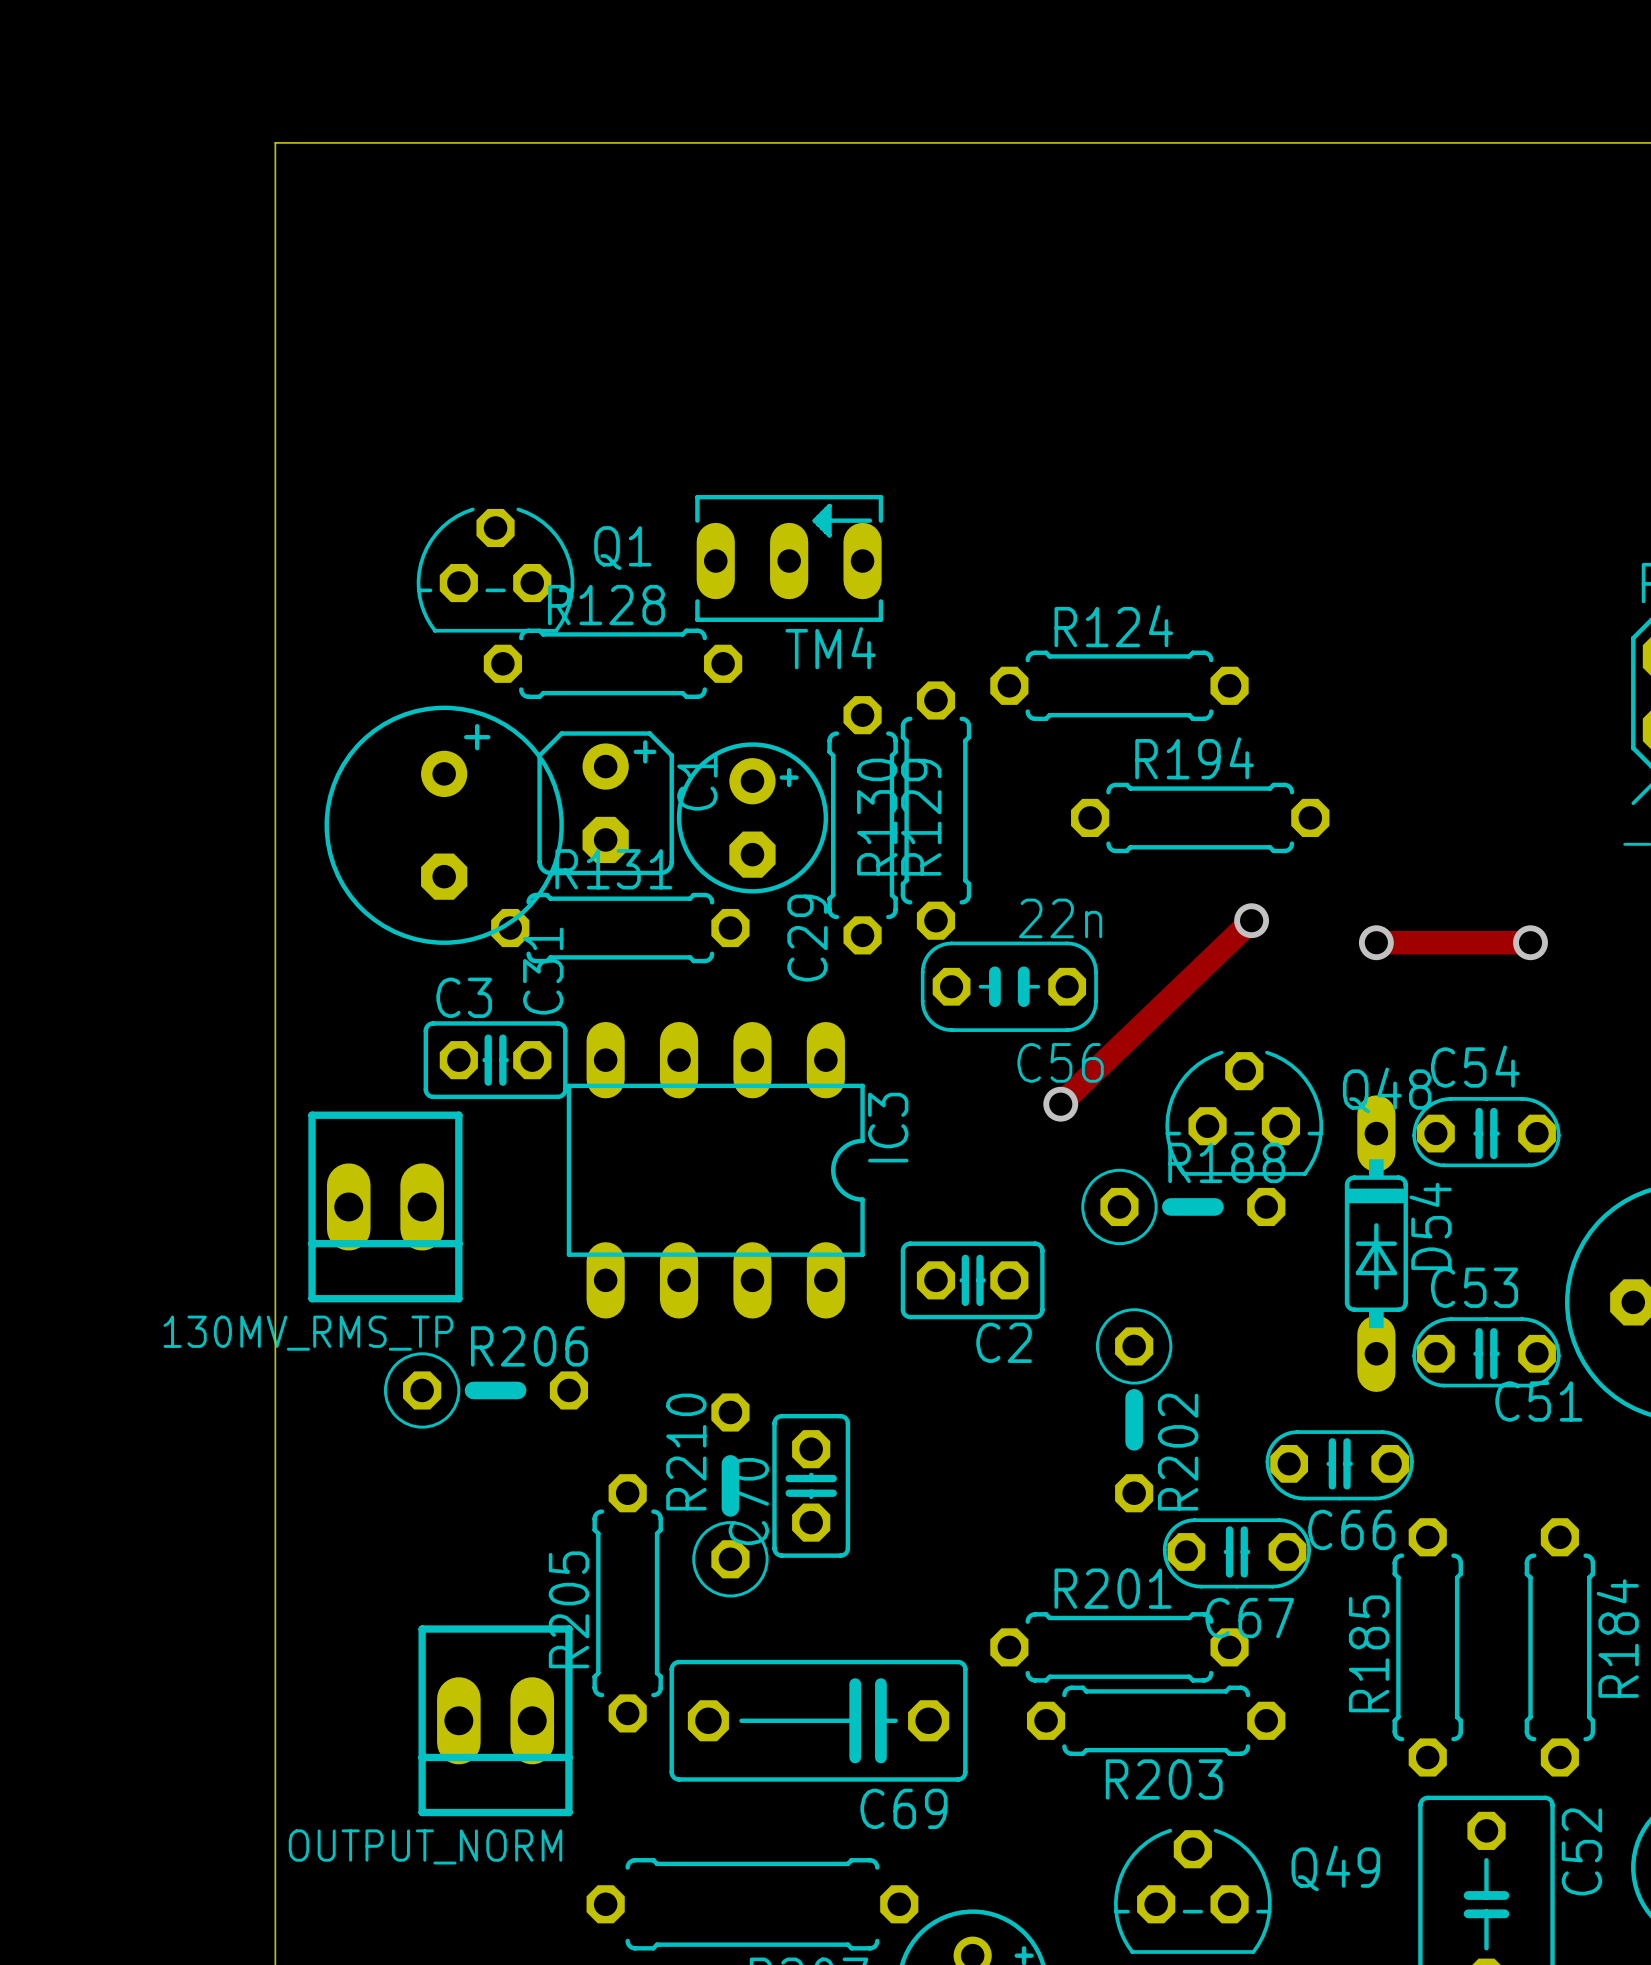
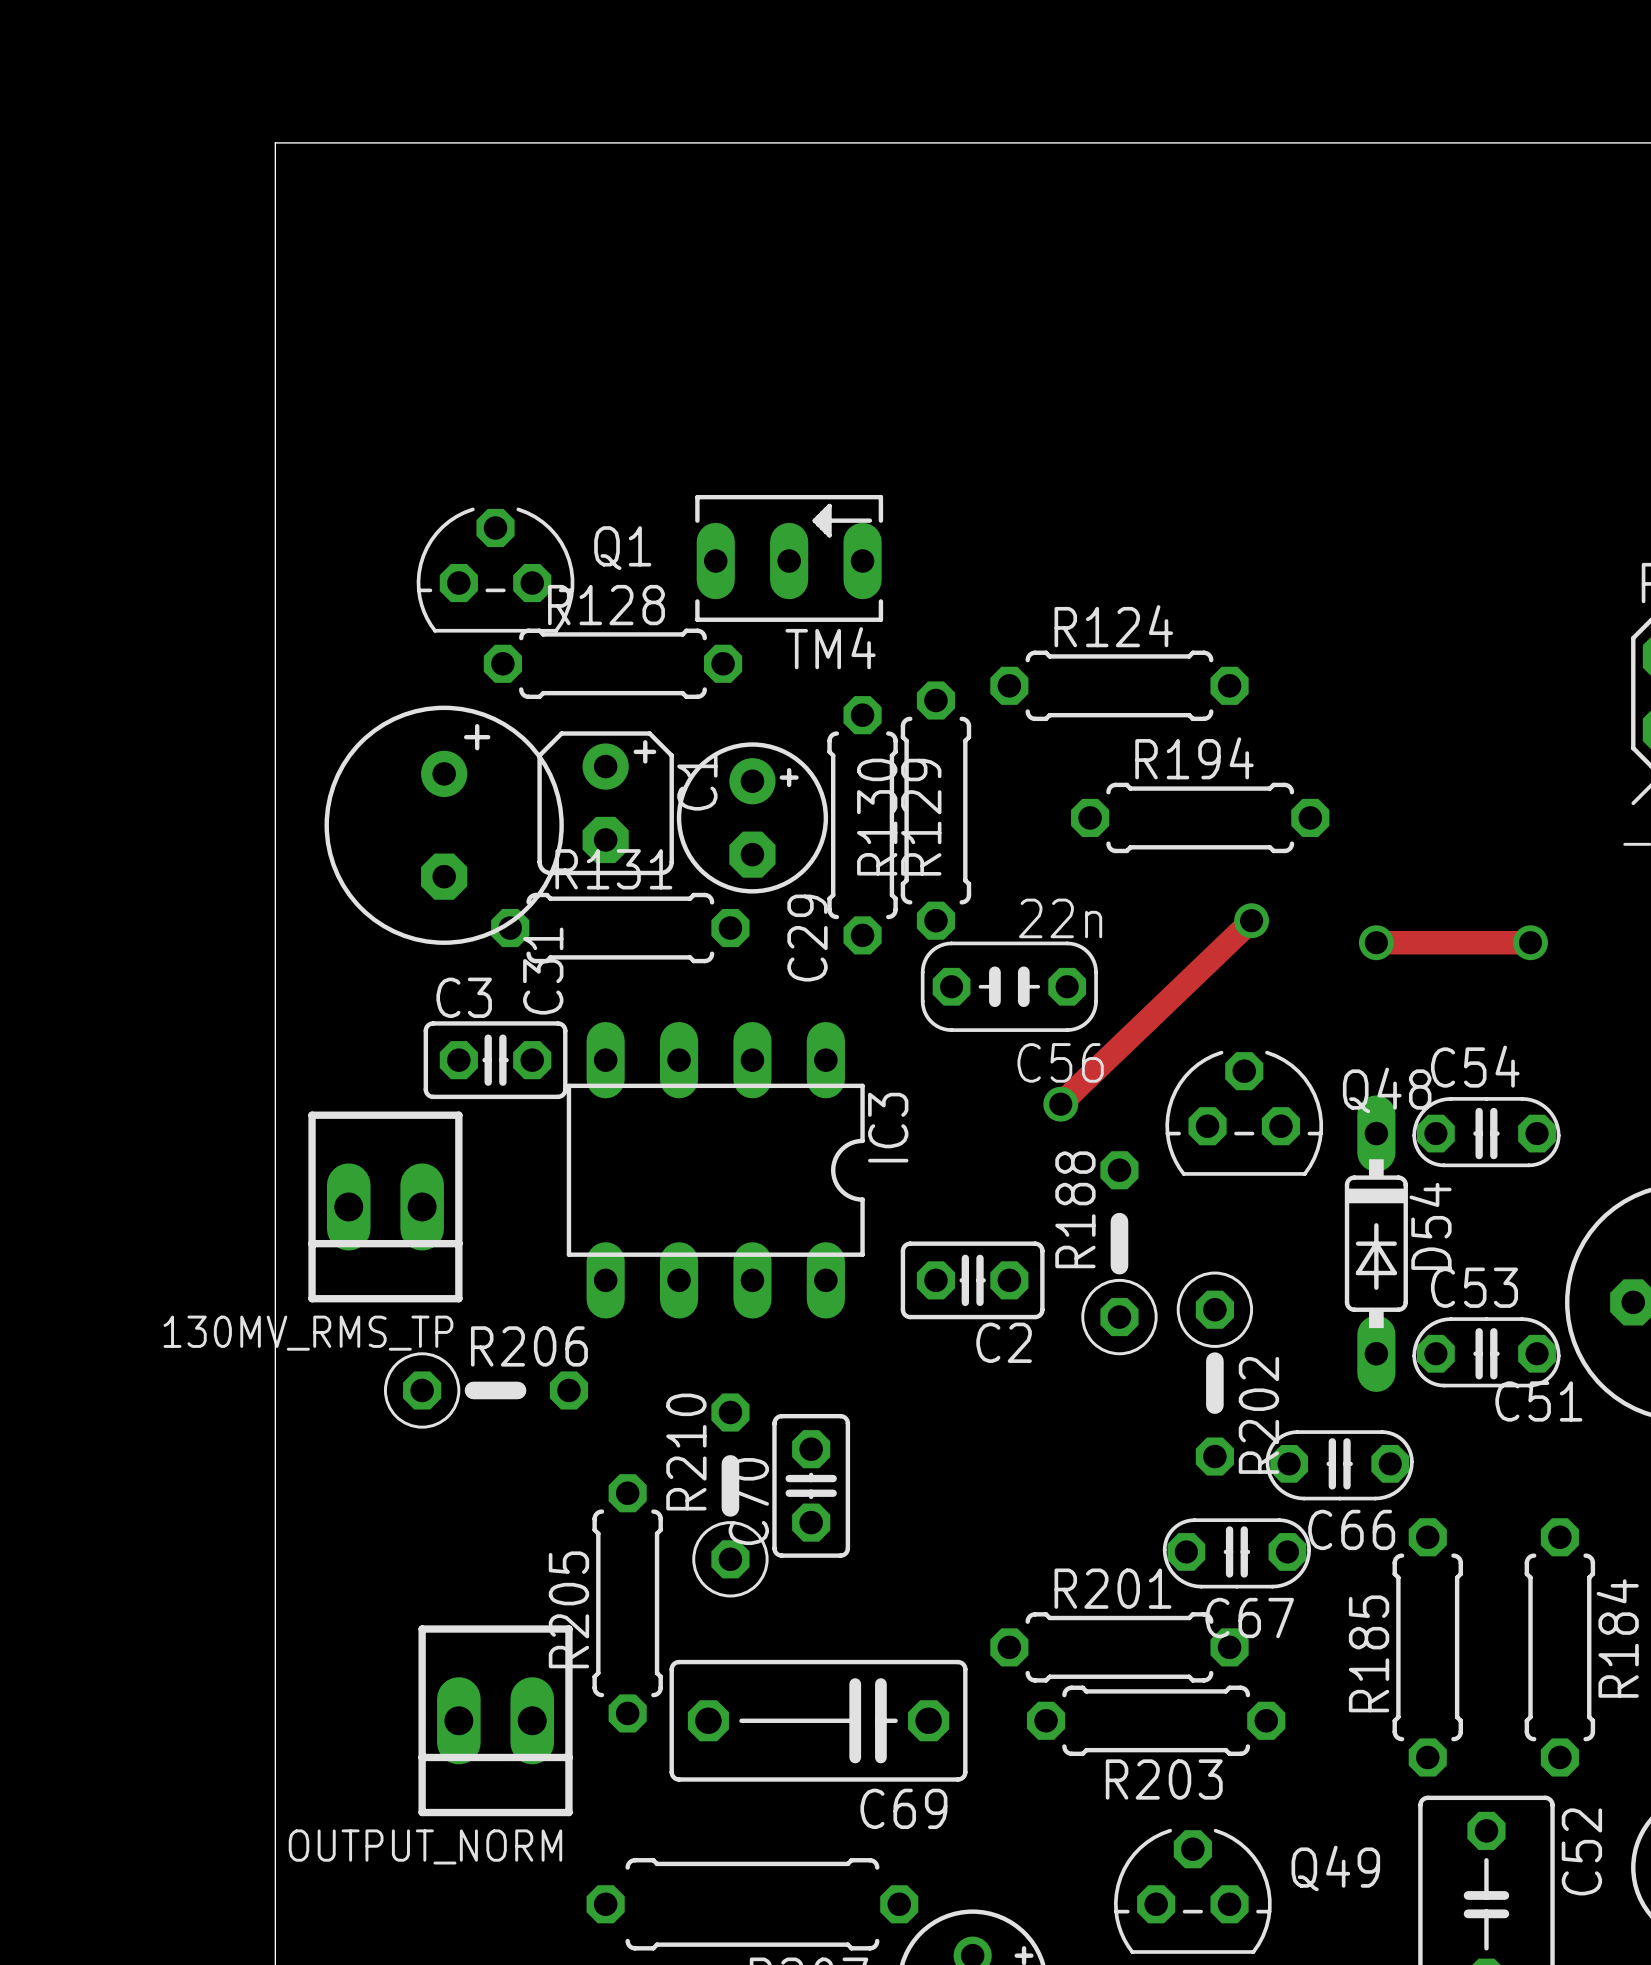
R188 rotation: 0° (1183, 1206) -> 90° counterclockwise (1119, 1253)
R202 position: (1134, 1410) -> (1214, 1373)

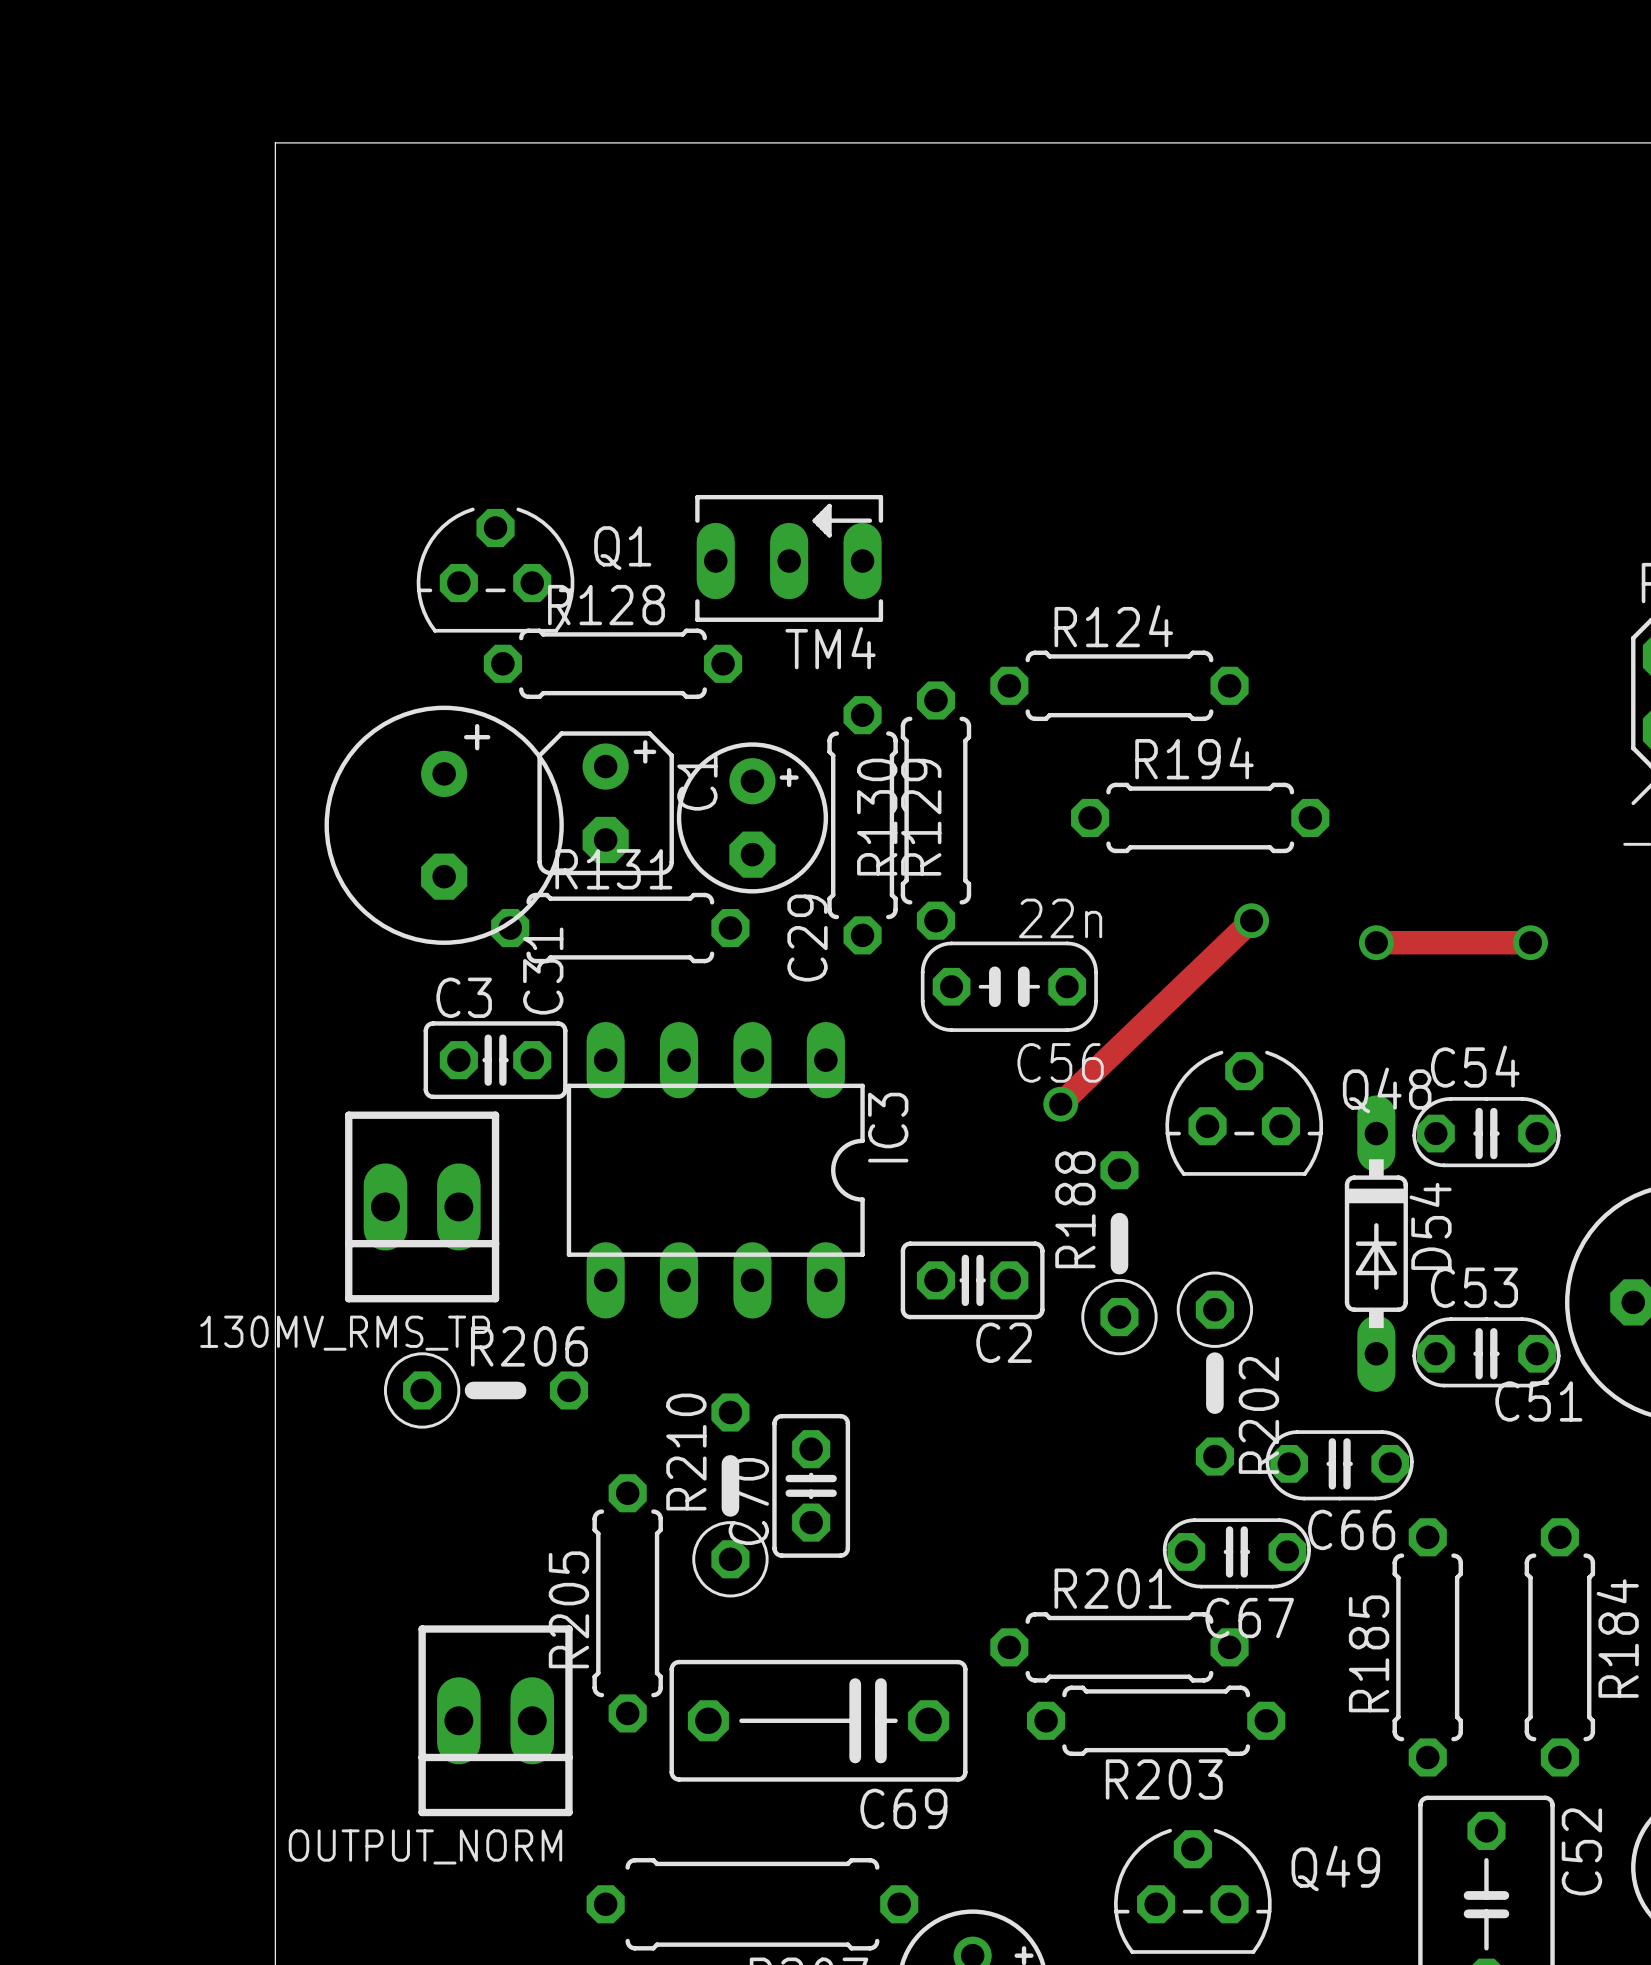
130MV_RMS_TP position: (385, 1206) -> (422, 1206)

